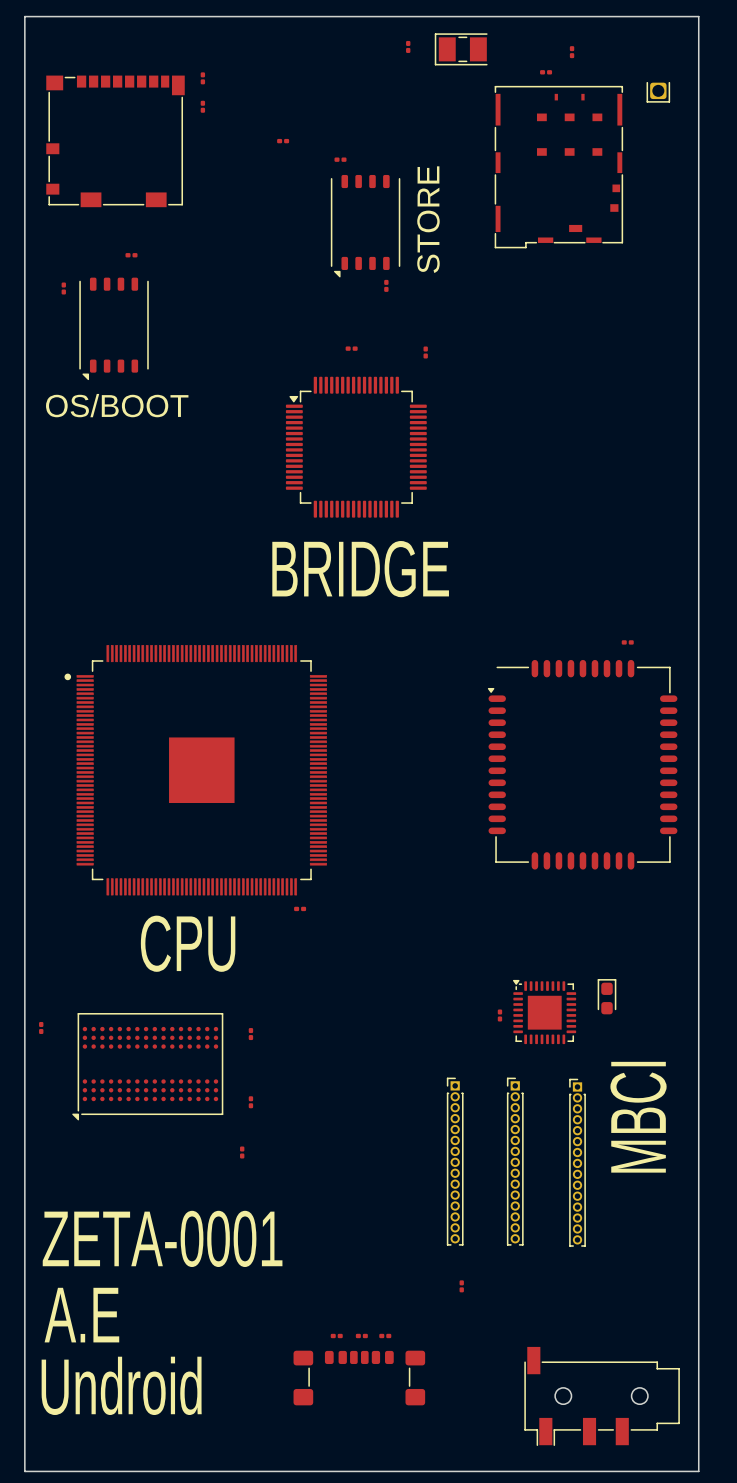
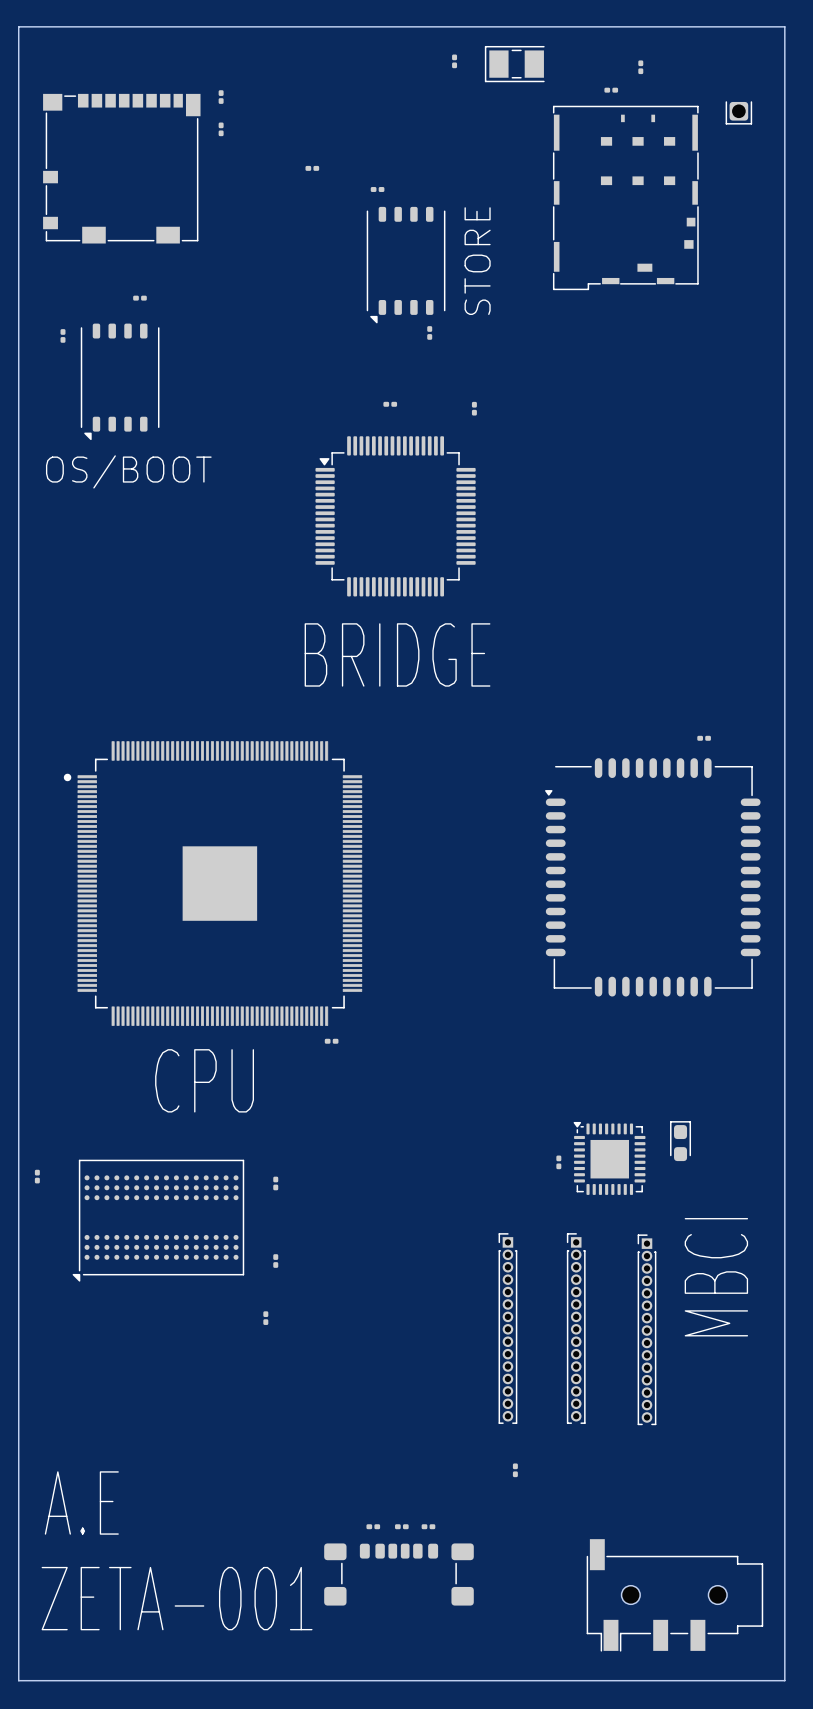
text: ZETA-0001 (162, 1238) -> none
text: Undroid (121, 1385) -> none
text: none -> ZETA-001 (177, 1598)

